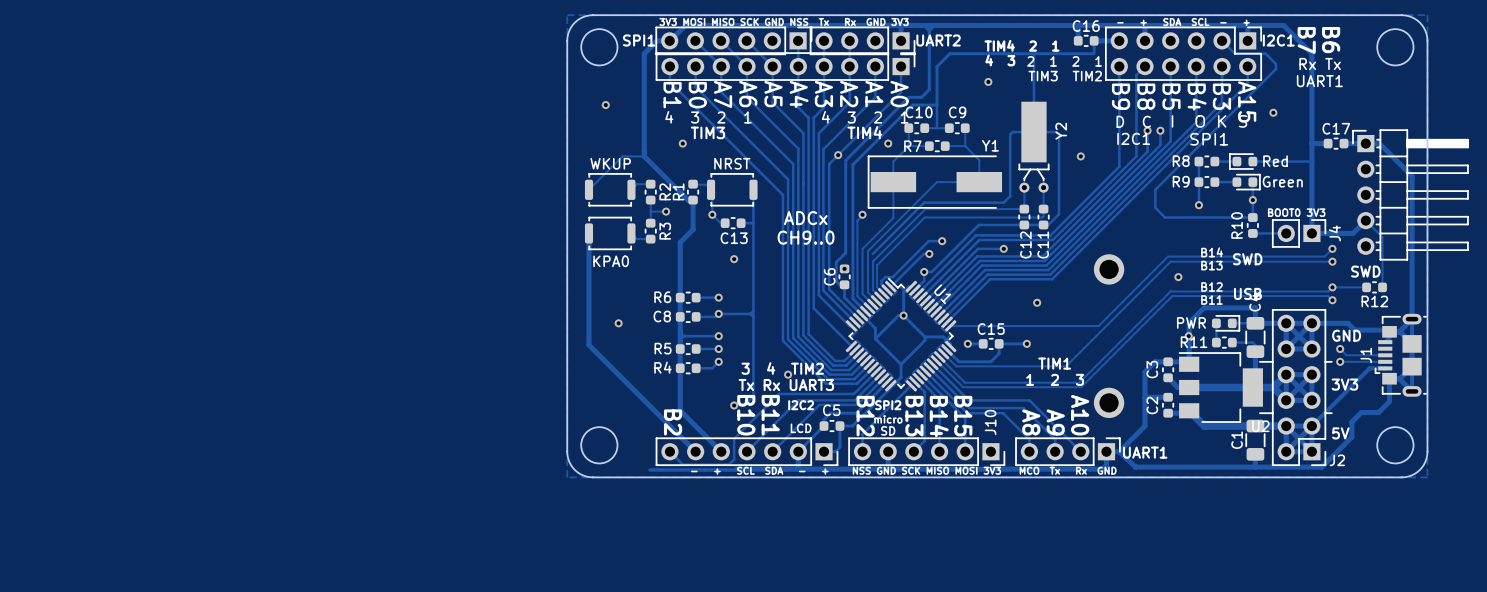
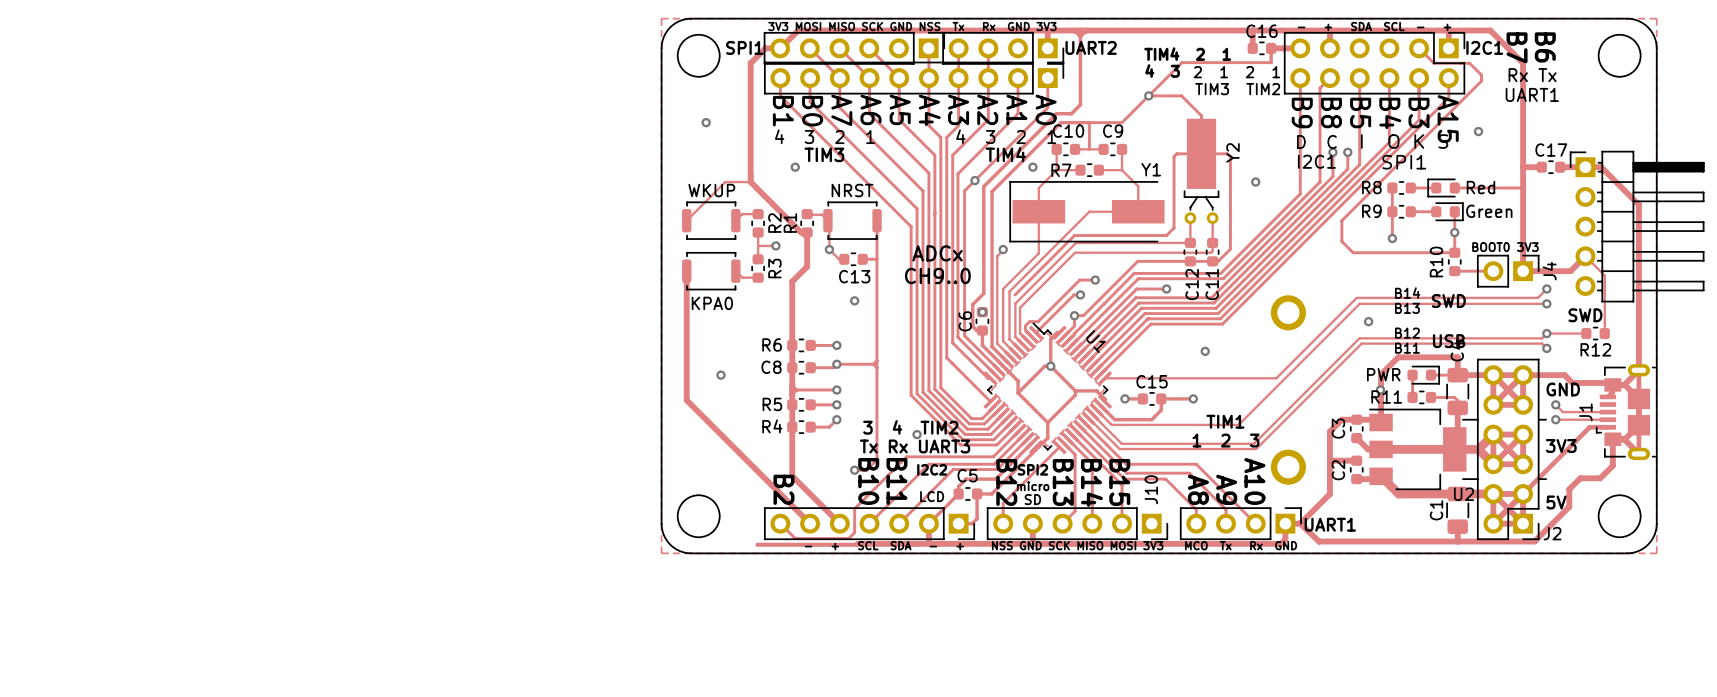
track: (1034, 53) (1033, 99) -> (1148, 95) (1181, 95) (1201, 115)
track: (1094, 53) (949, 53) (937, 66) (937, 105) -> (1271, 62) (1182, 62) (1122, 122) (1089, 122)

